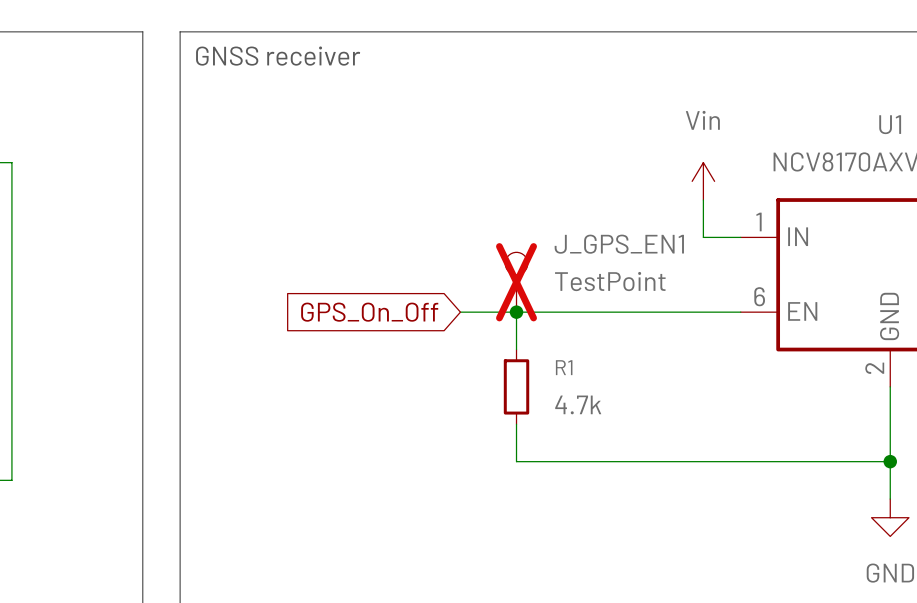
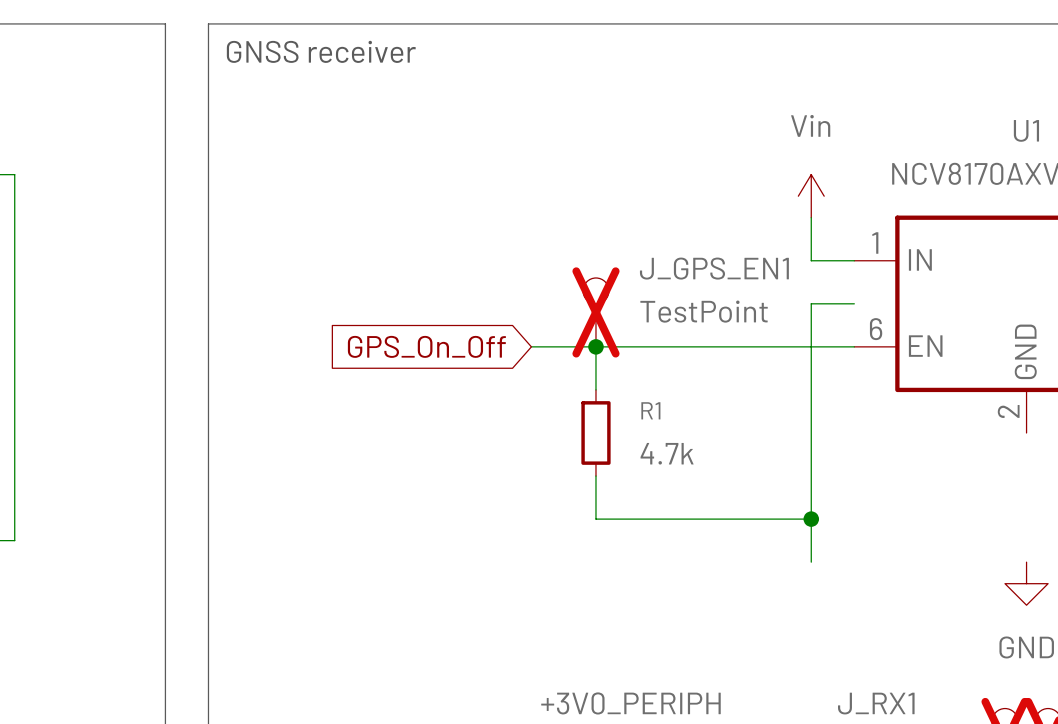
wire: none -> (854, 303) (811, 303) (811, 562)
wire: (890, 386) (890, 499) -> none
wire: (703, 461) (890, 461) -> none
junction: none -> (811, 519)
junction: (890, 461) -> none

